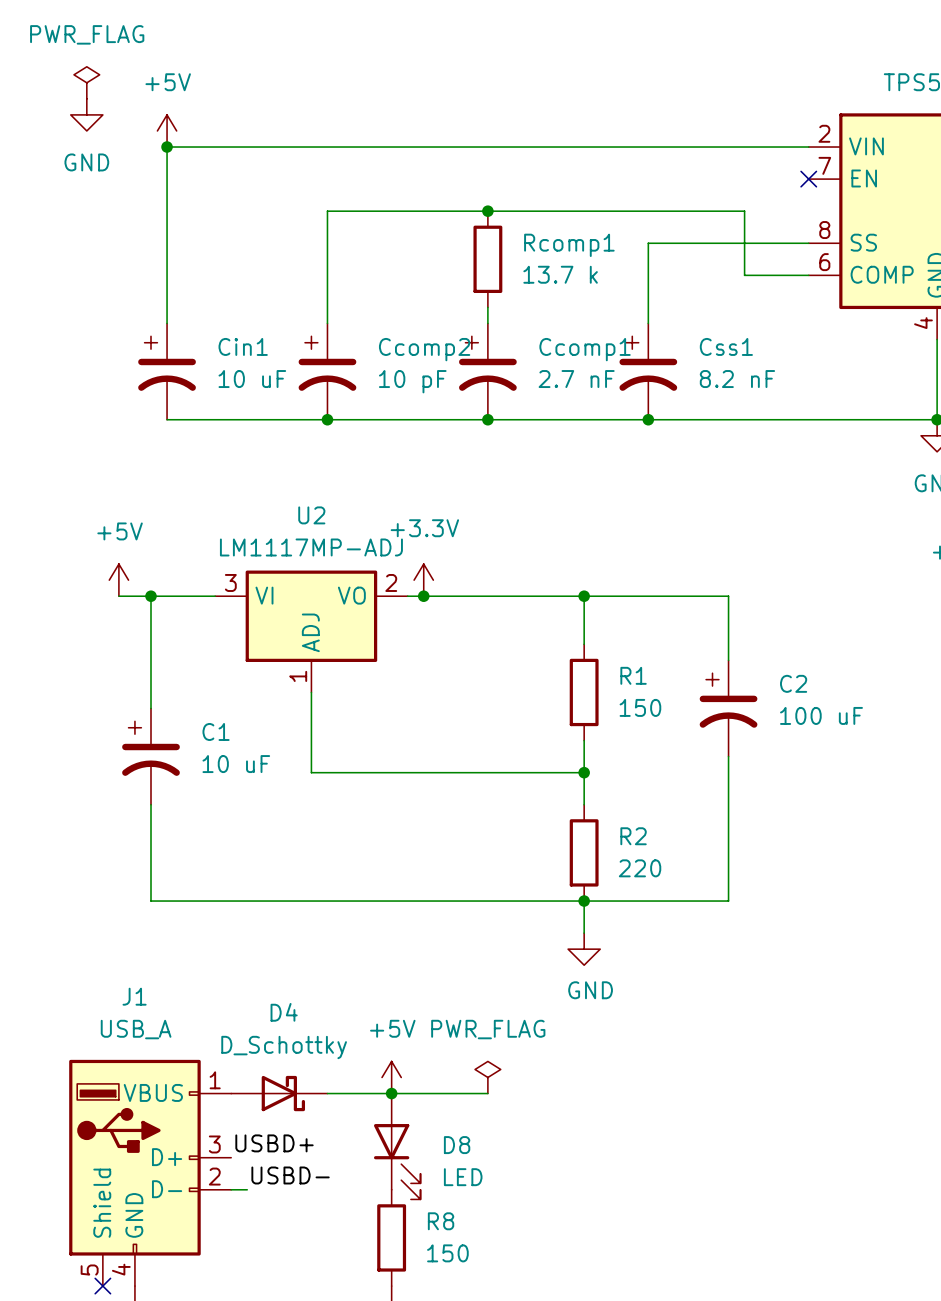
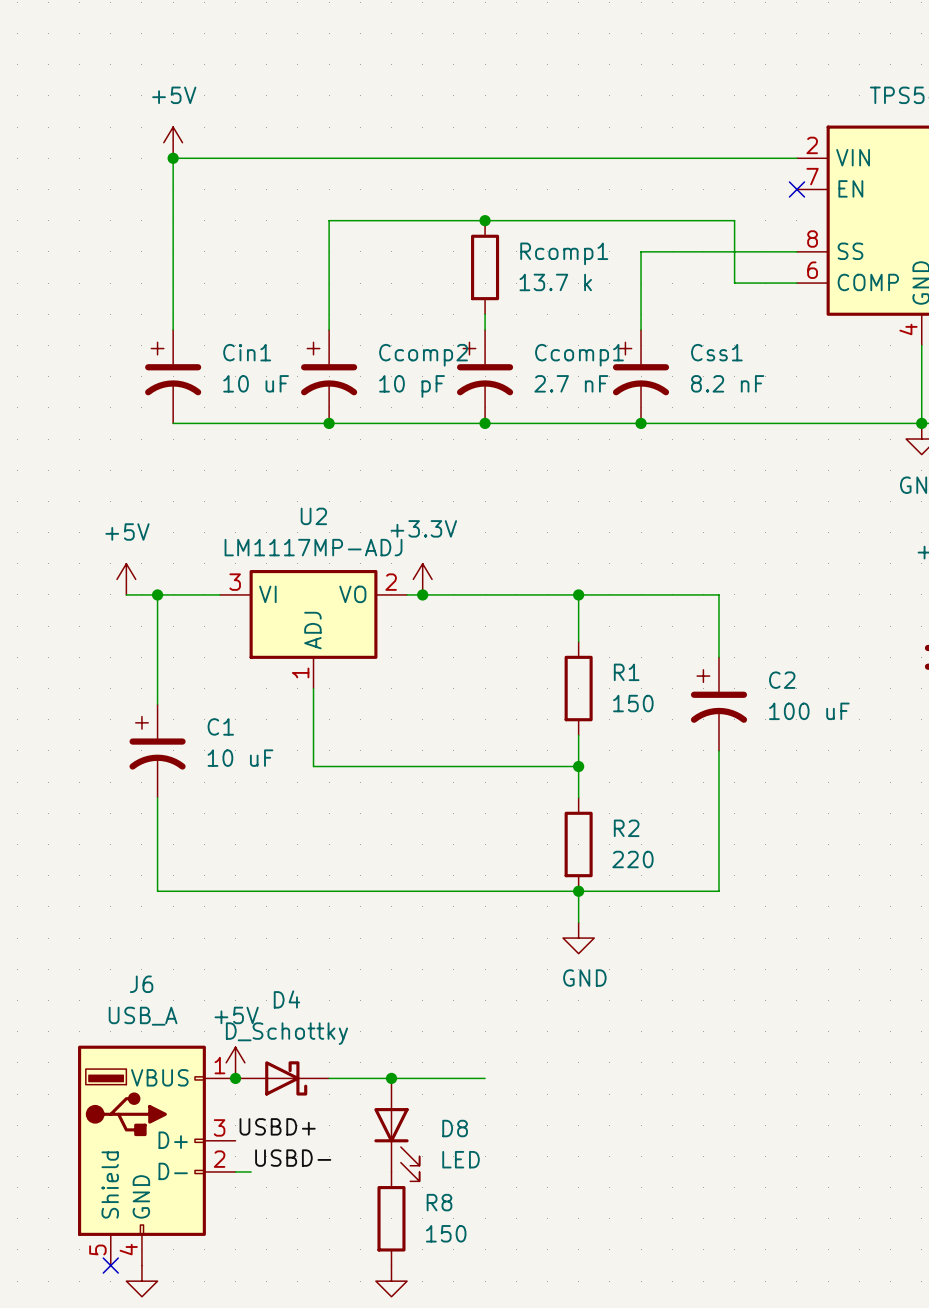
power symbol: PWR_FLAG (86, 82) -> none
power symbol: GND (86, 114) -> none
J1 name: J1 (134, 996) -> J6 (141, 984)
power symbol position: +5V (391, 1077) -> +5V (235, 1062)
power symbol: PWR_FLAG (487, 1077) -> none
junction: none -> (235, 1078)

